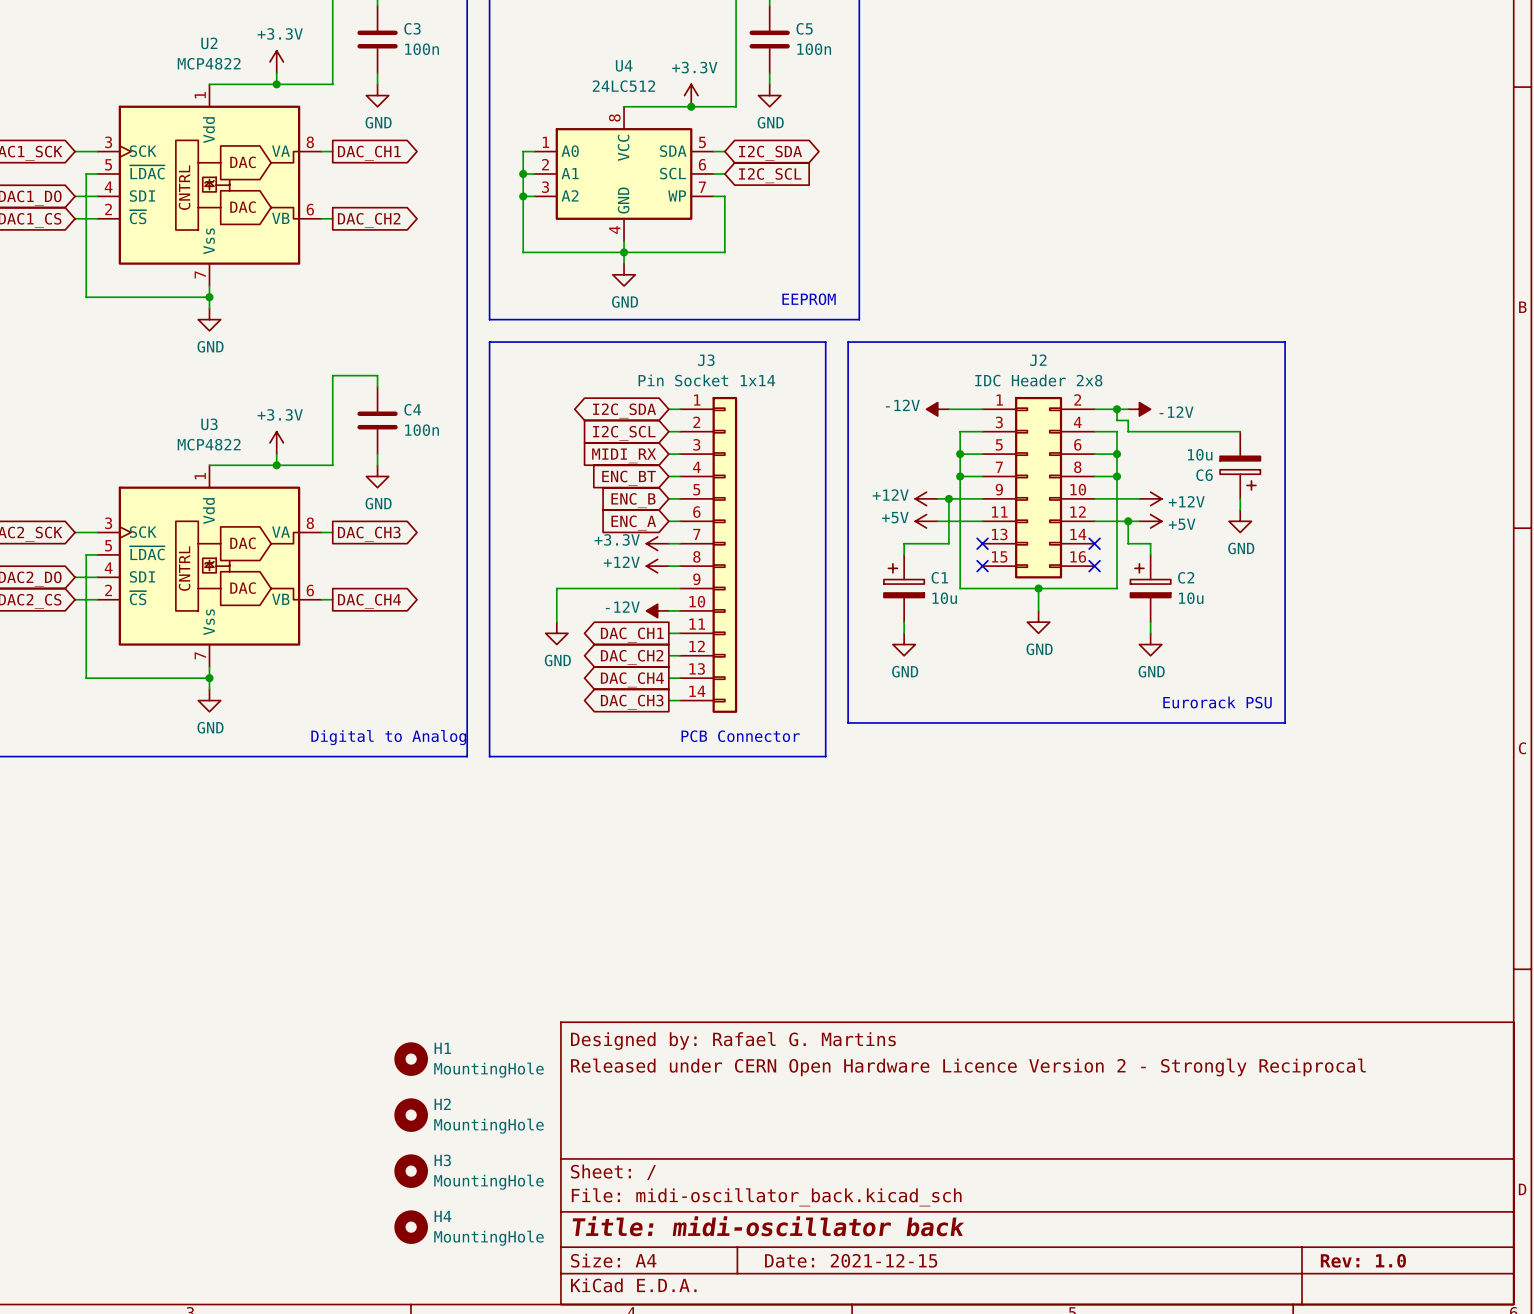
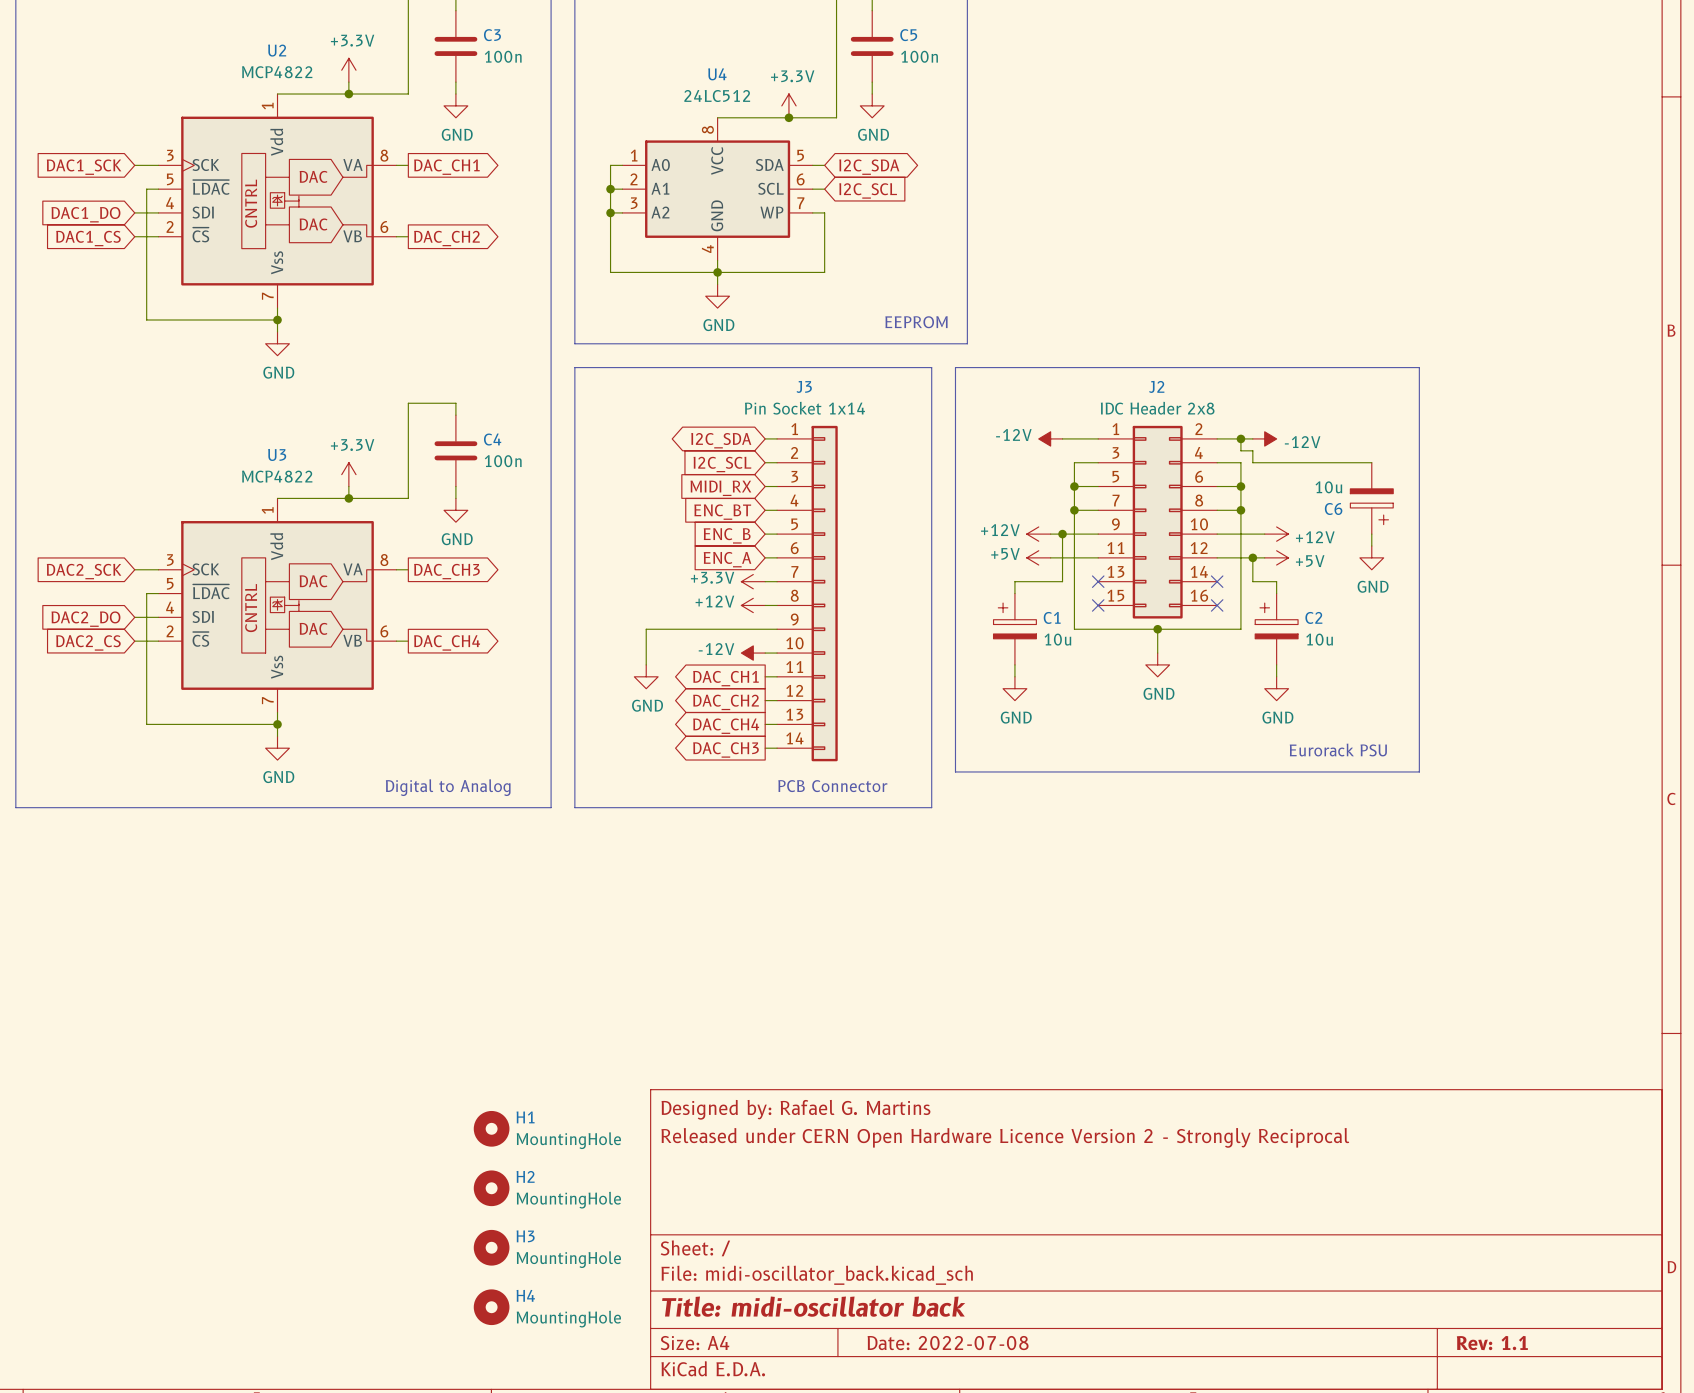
title block: Date: 2021-12-15 (851, 1260) -> Date: 2022-07-08 (948, 1343)
title block: Rev: 1.0 (1363, 1260) -> Rev: 1.1 (1492, 1343)

